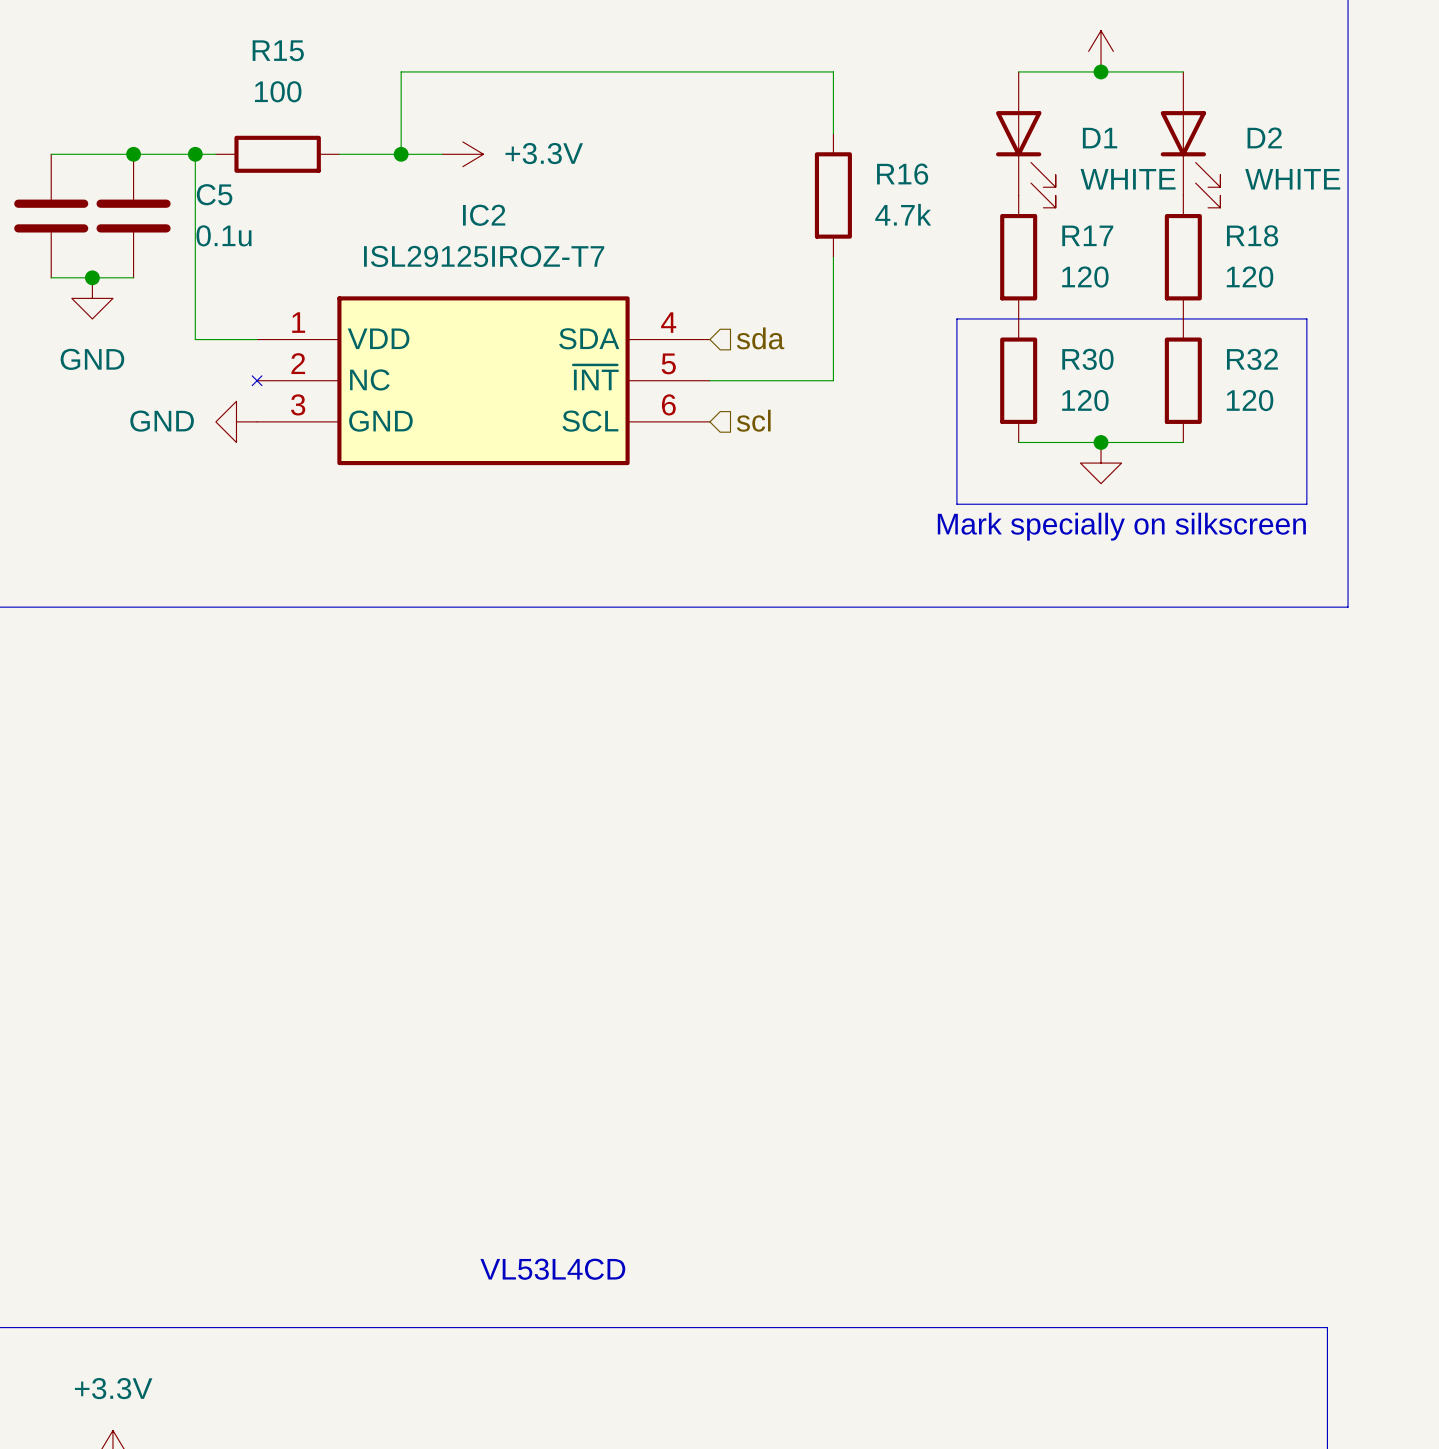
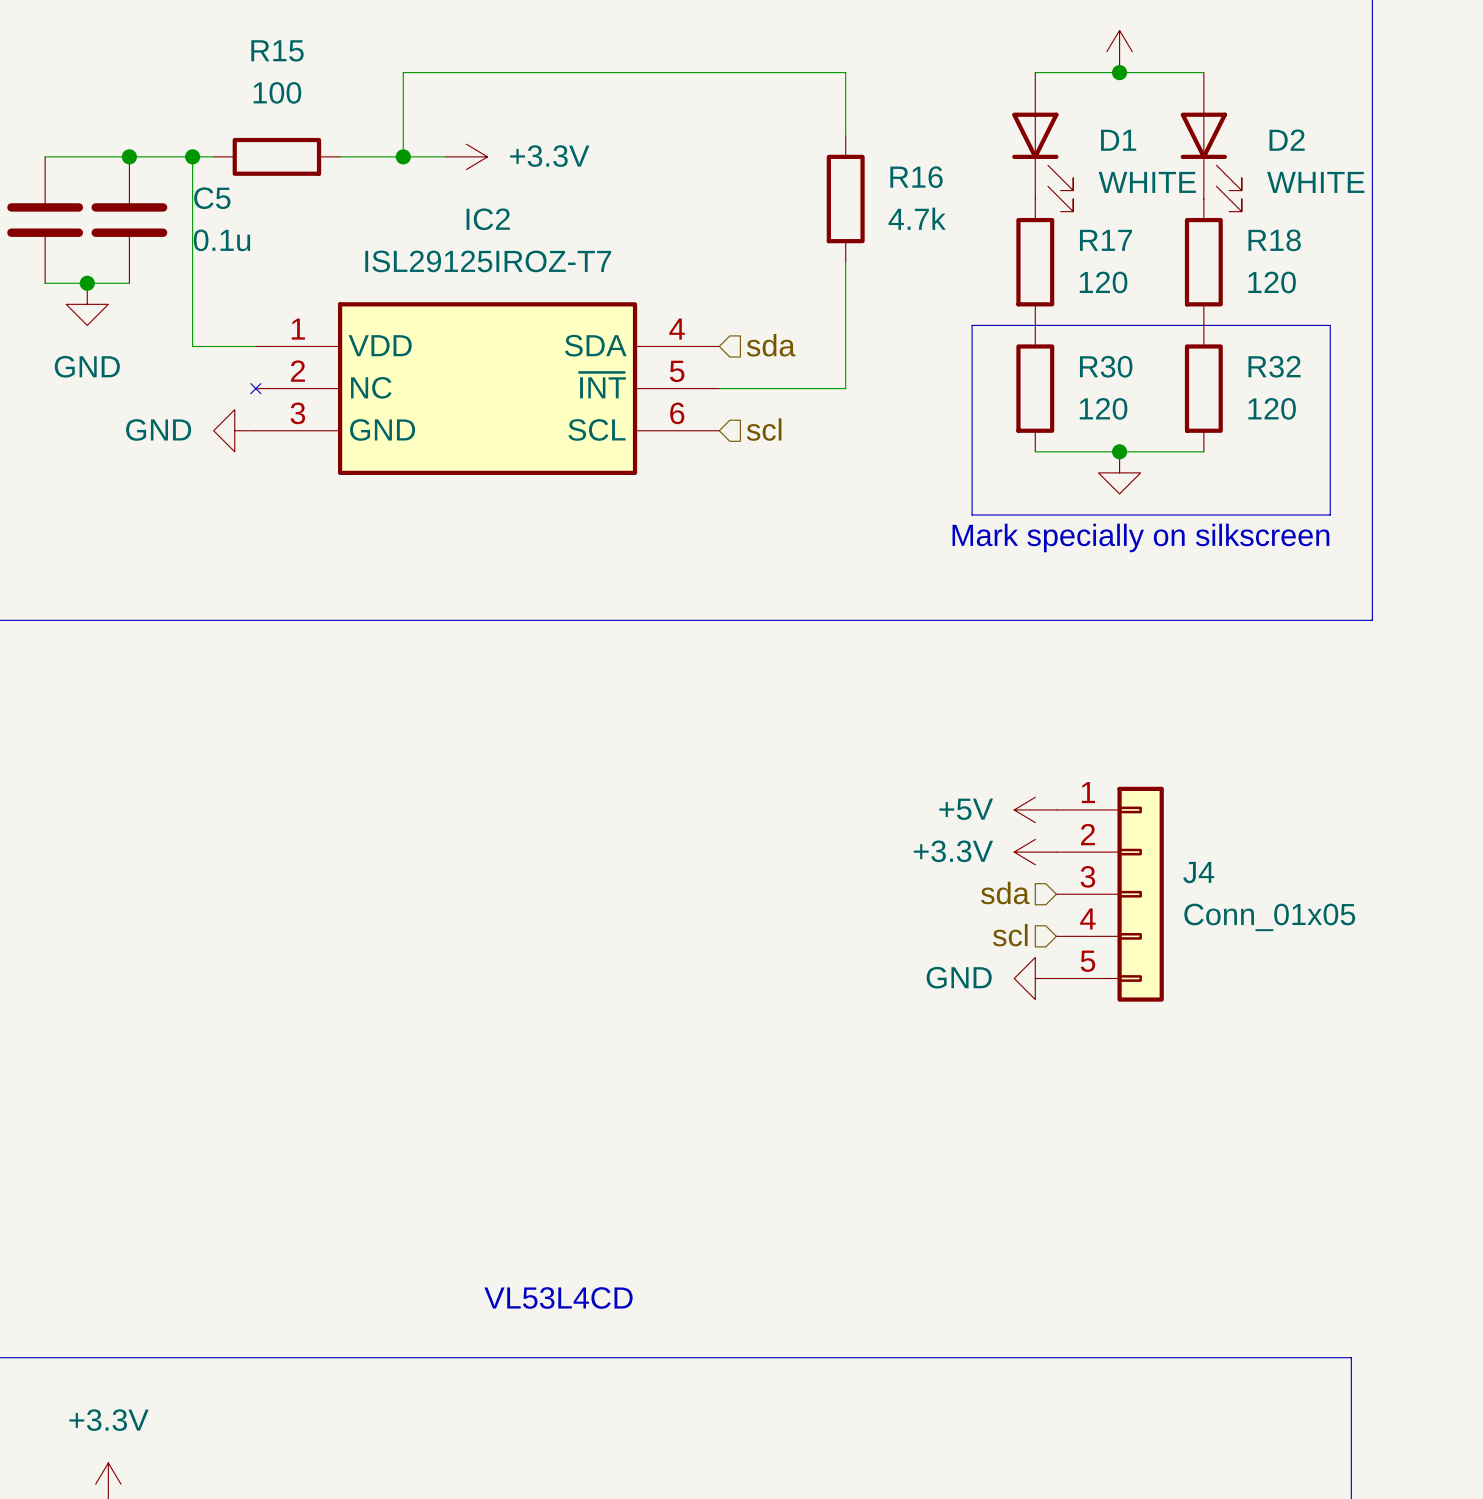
power symbol: none -> +5V (1035, 809)
power symbol: none -> +3.3V (1035, 852)
hierarchical label: none -> sda (1005, 893)
J4: none -> Conn_01x05 (1110, 894)
hierarchical label: none -> scl (1010, 935)
power symbol: none -> GND (1035, 978)

